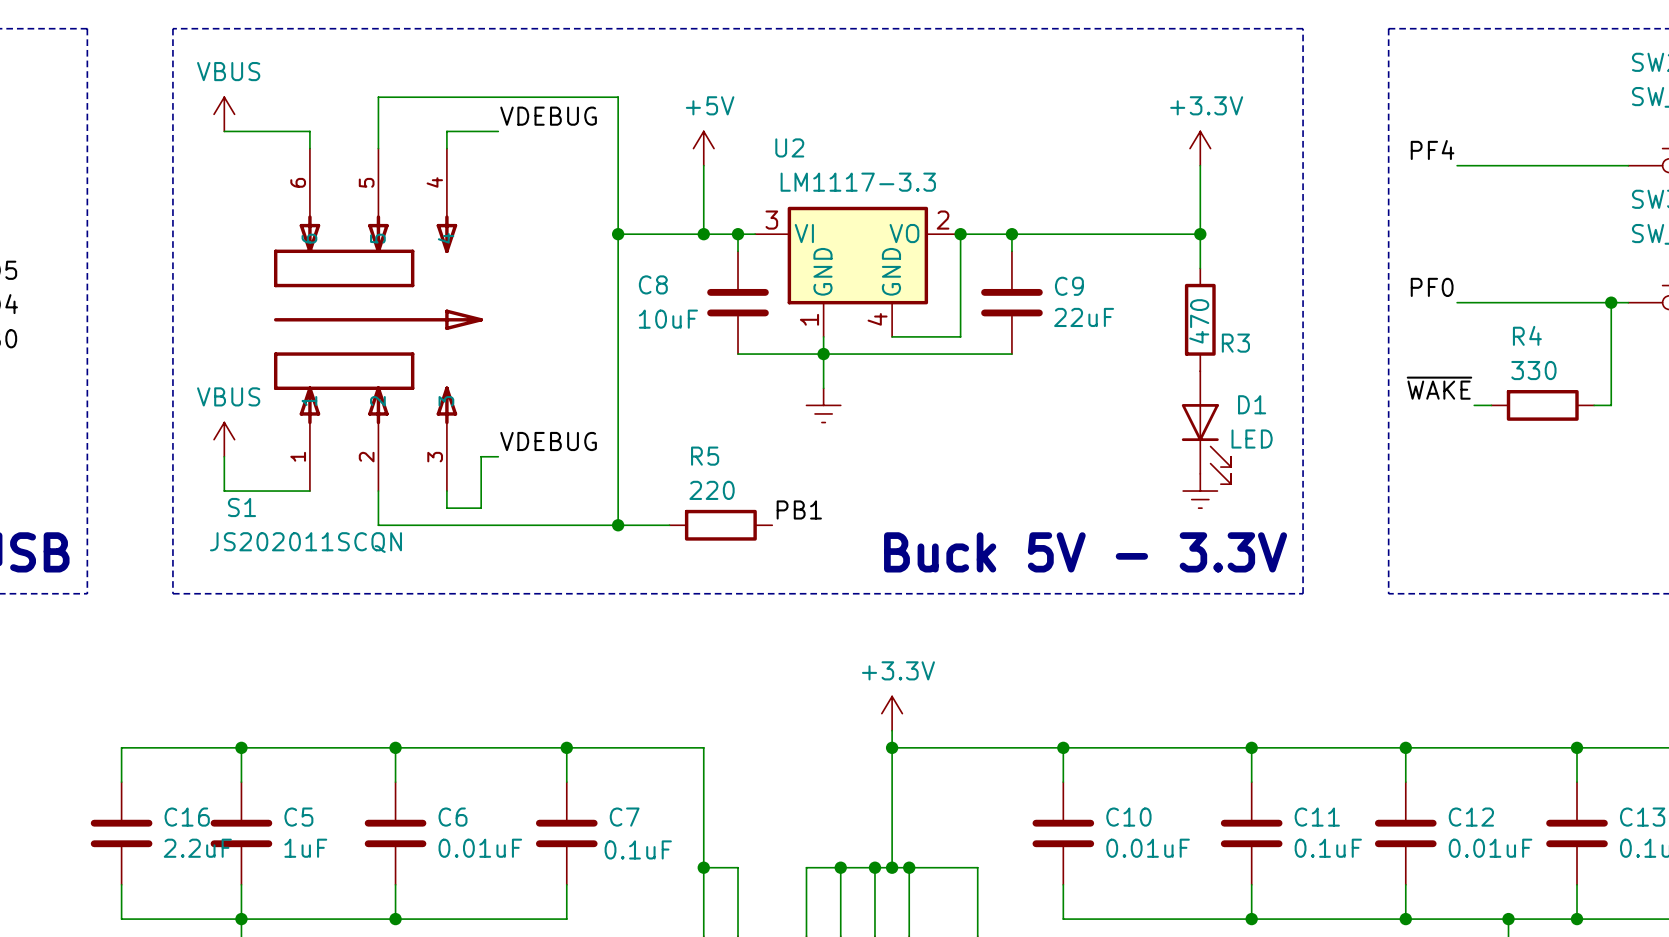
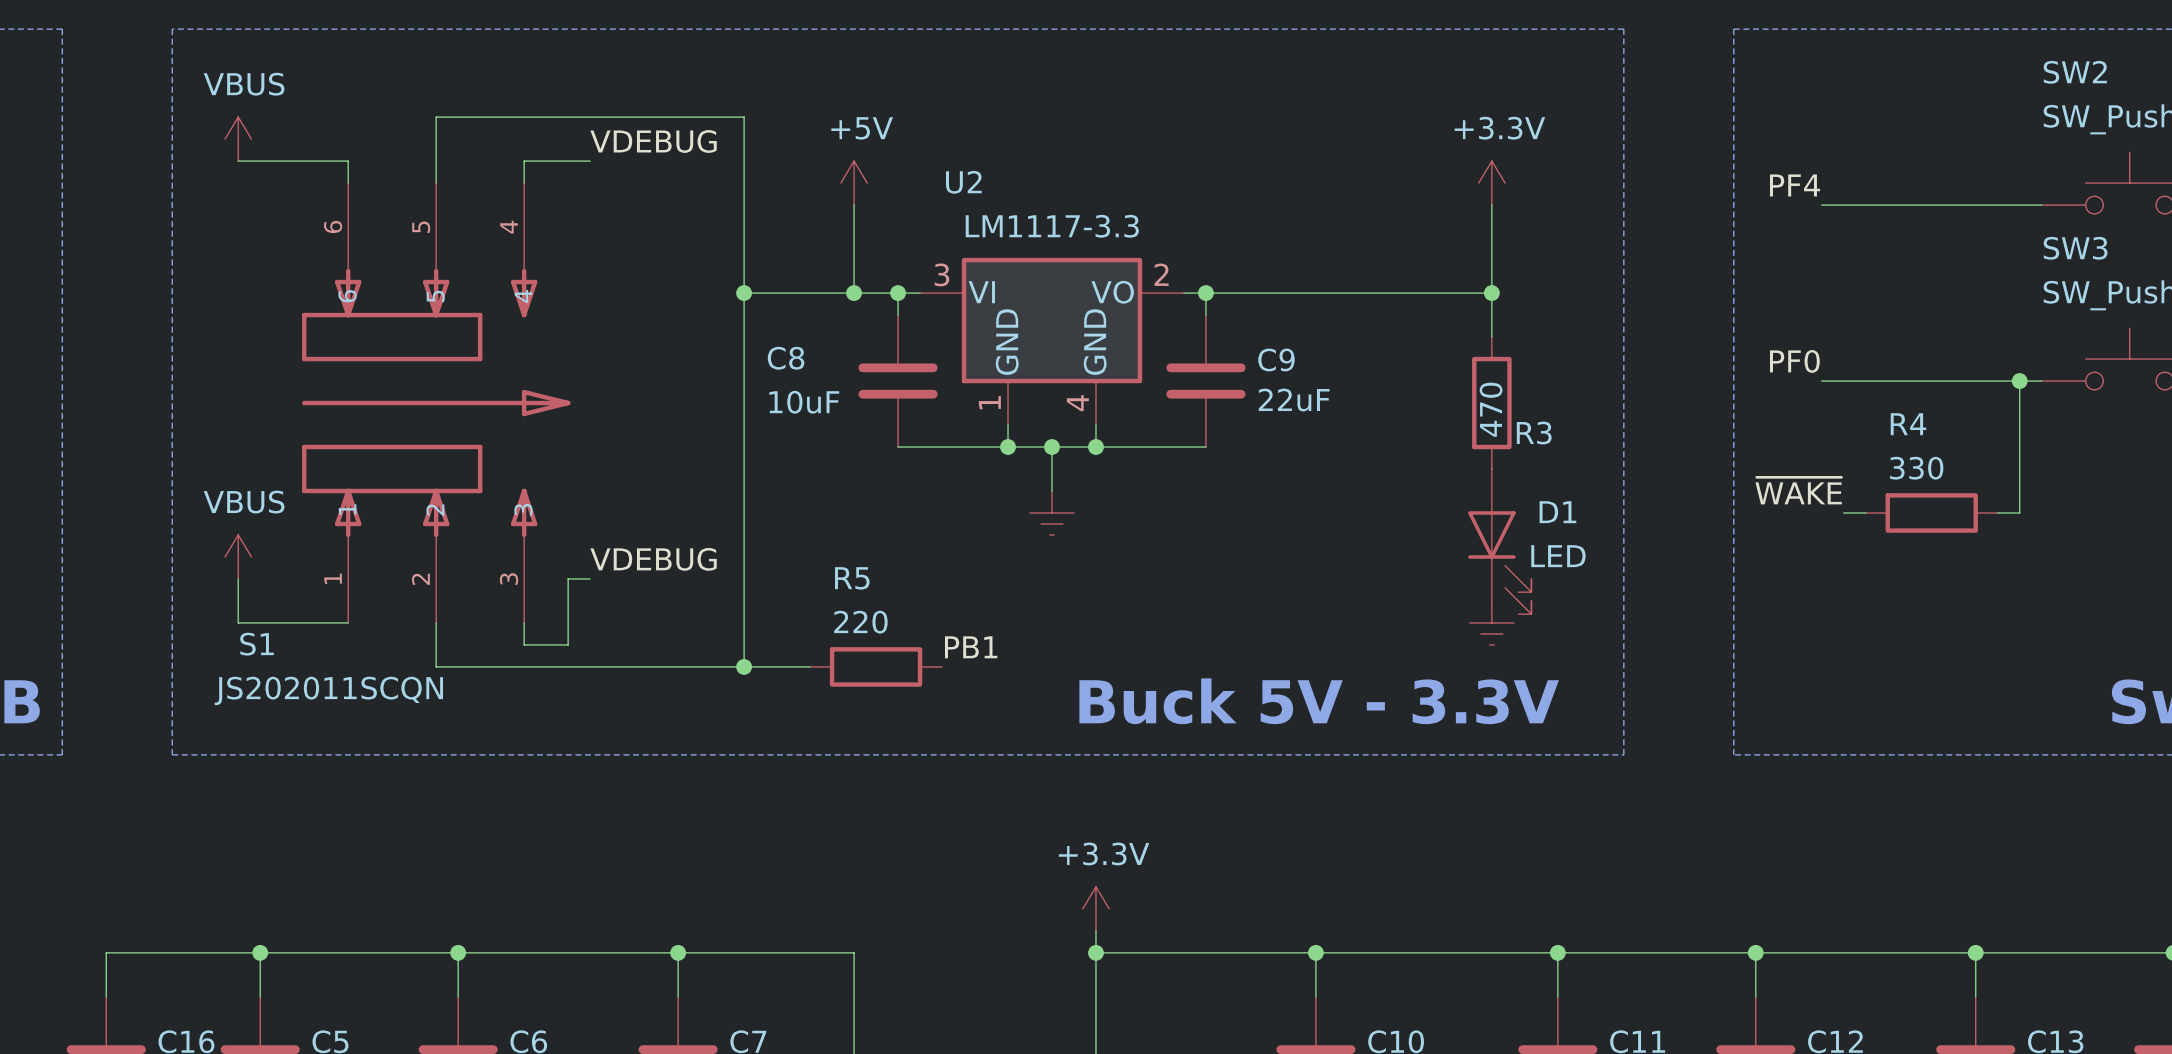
wire: (960, 234) (960, 336) (892, 336) -> (1095, 447) (1095, 425)
junction: (960, 234) -> none
junction: none -> (1205, 293)
wire: (1011, 234) (1011, 251) -> (1205, 293) (1205, 315)
junction: (1011, 234) -> none
C9 position: (1011, 302) -> (1205, 381)
wire: (823, 354) (823, 388) -> (1052, 447) (1052, 491)
junction: none -> (1052, 447)
junction: none -> (1095, 447)
wire: (977, 354) (1011, 354) -> none
power symbol position: (823, 405) -> (1052, 512)

